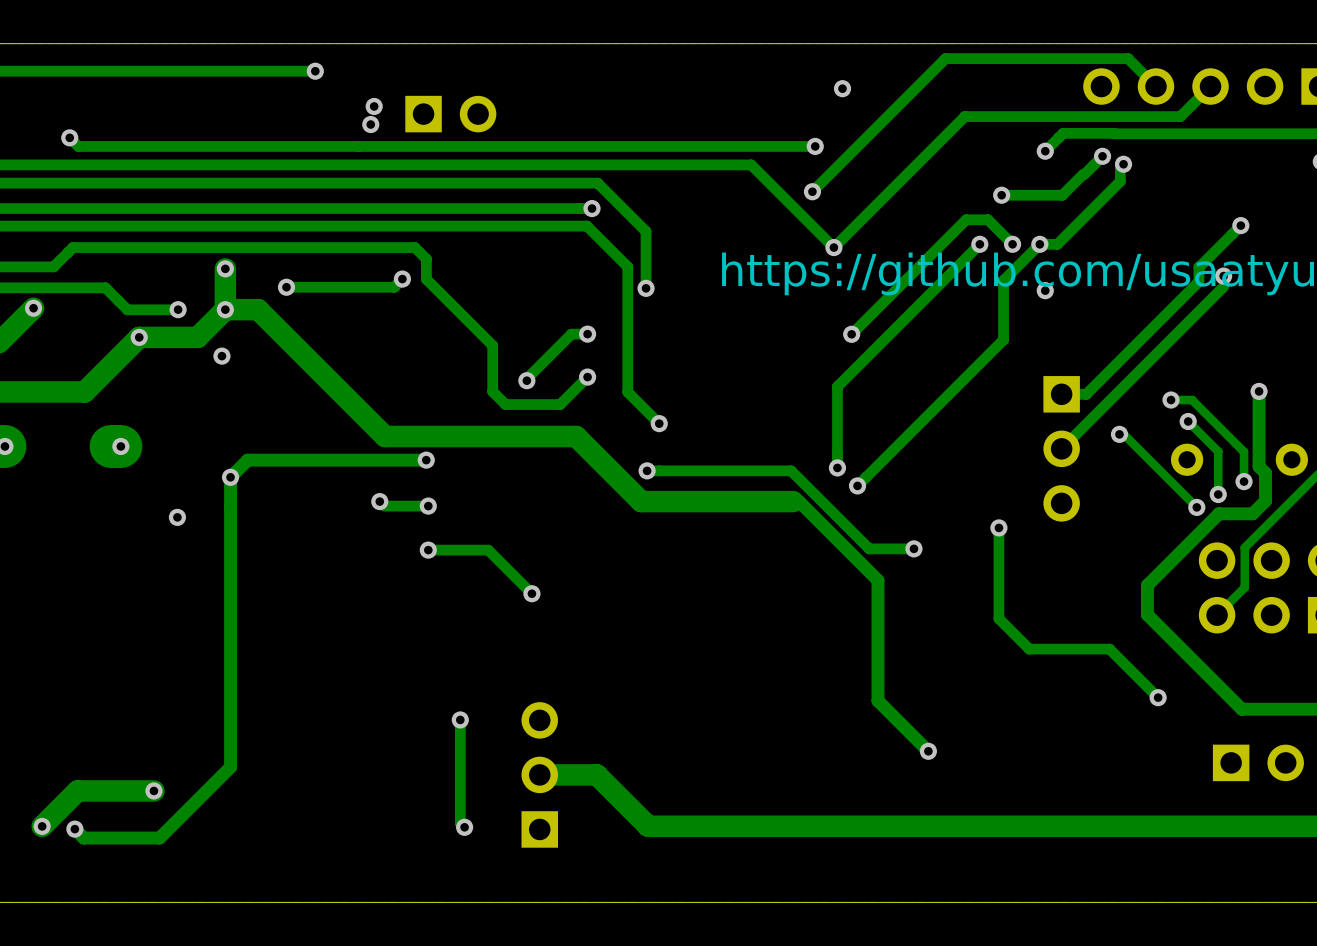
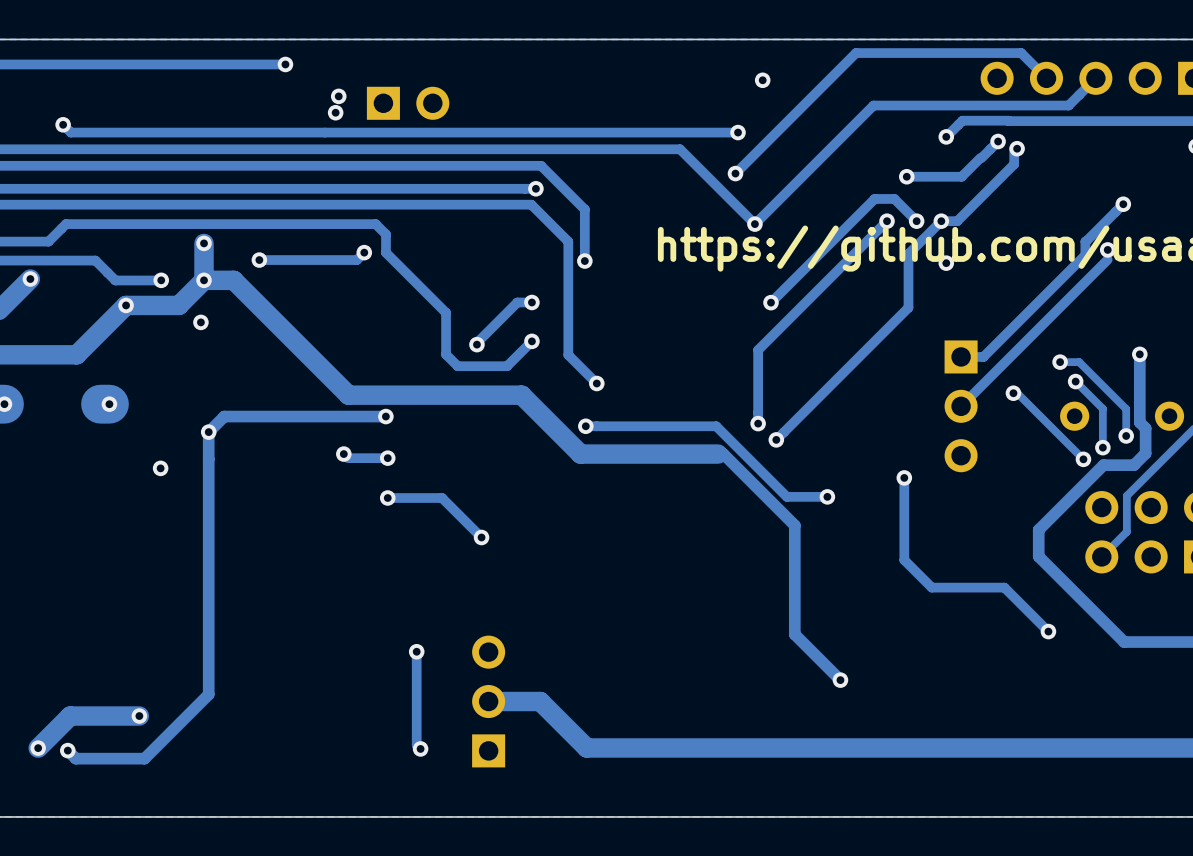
part: (1258, 762) -> none

